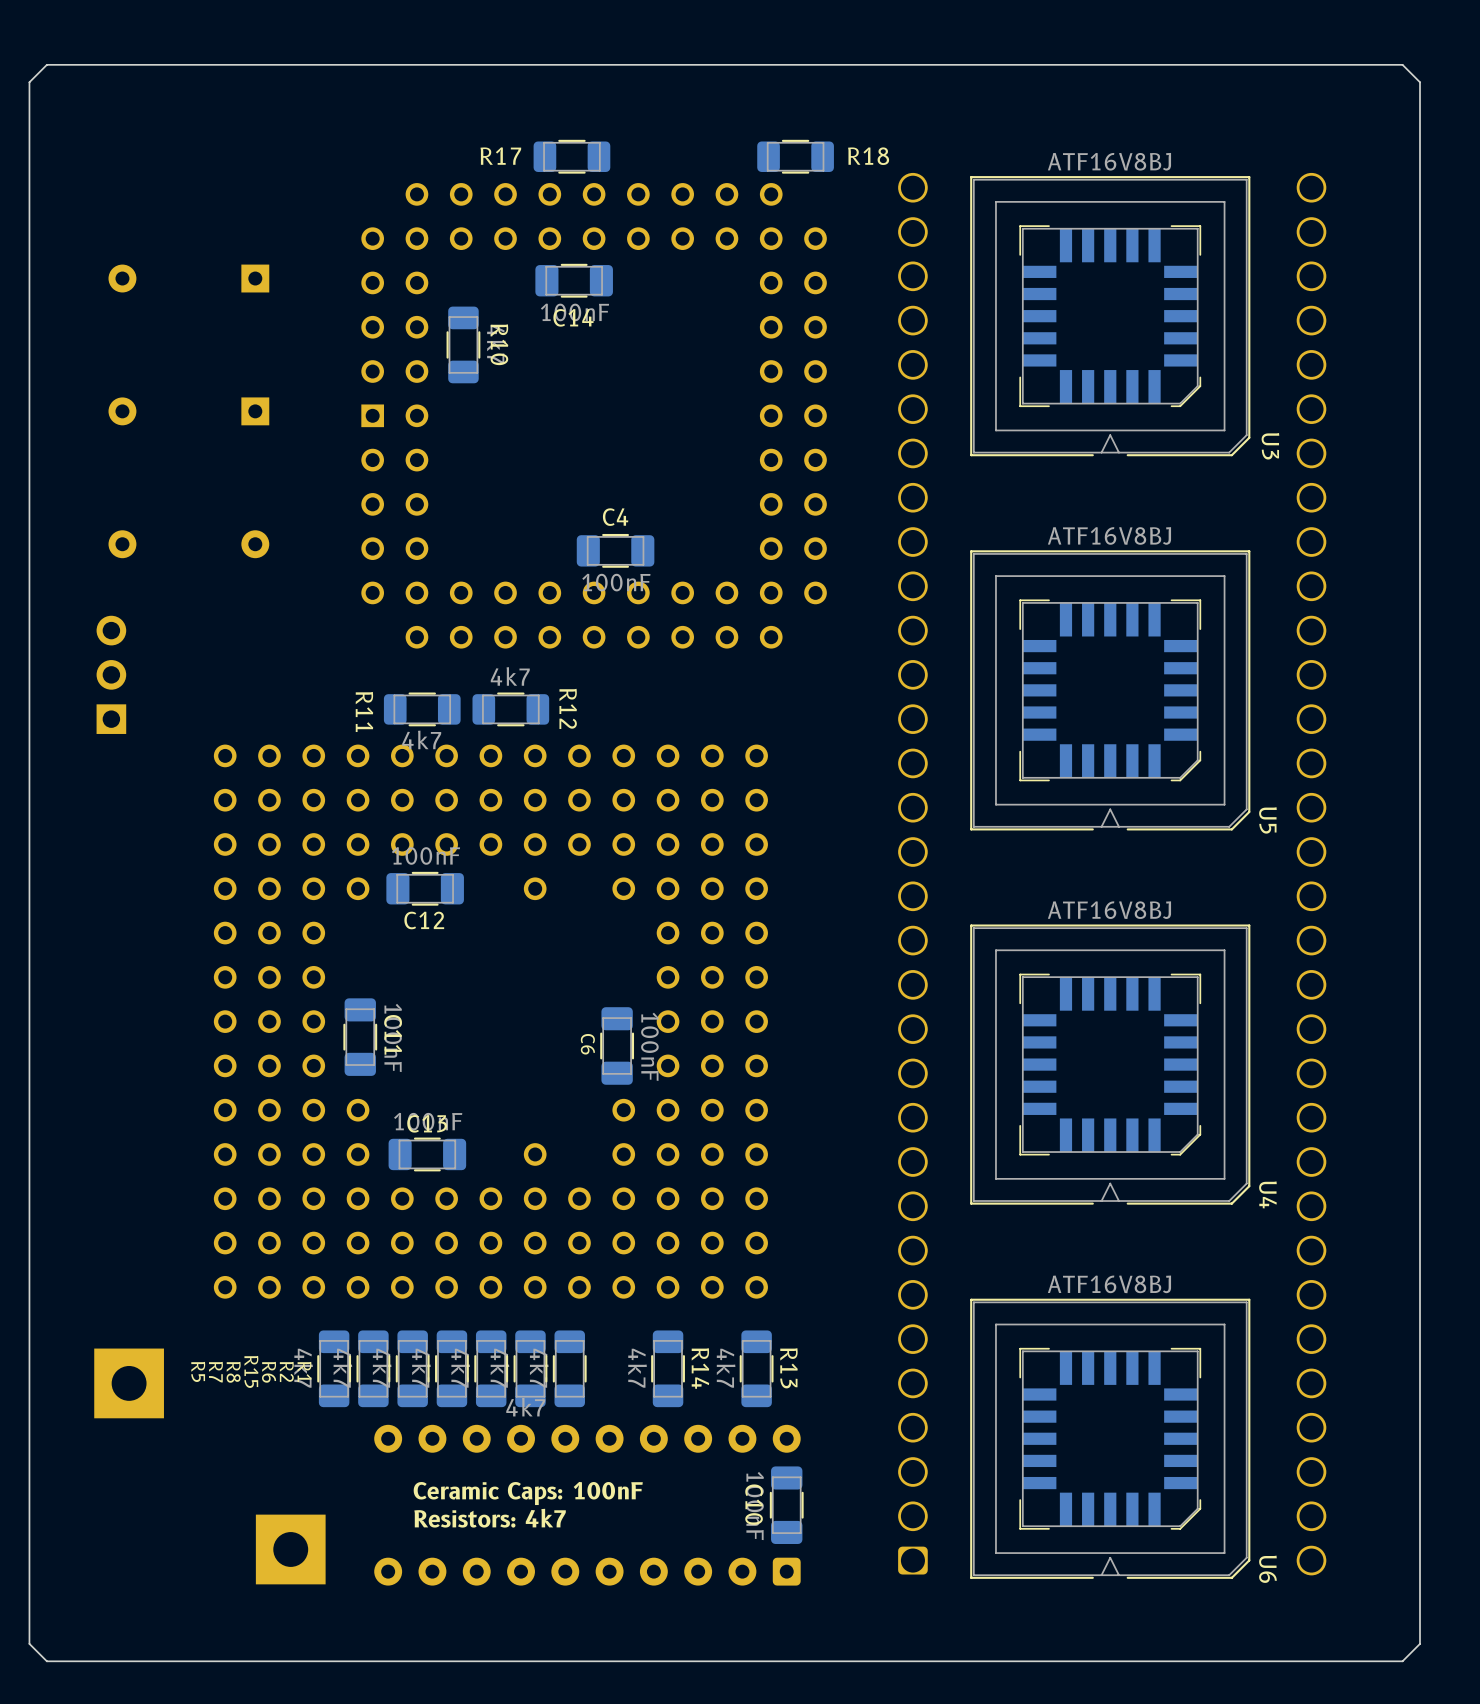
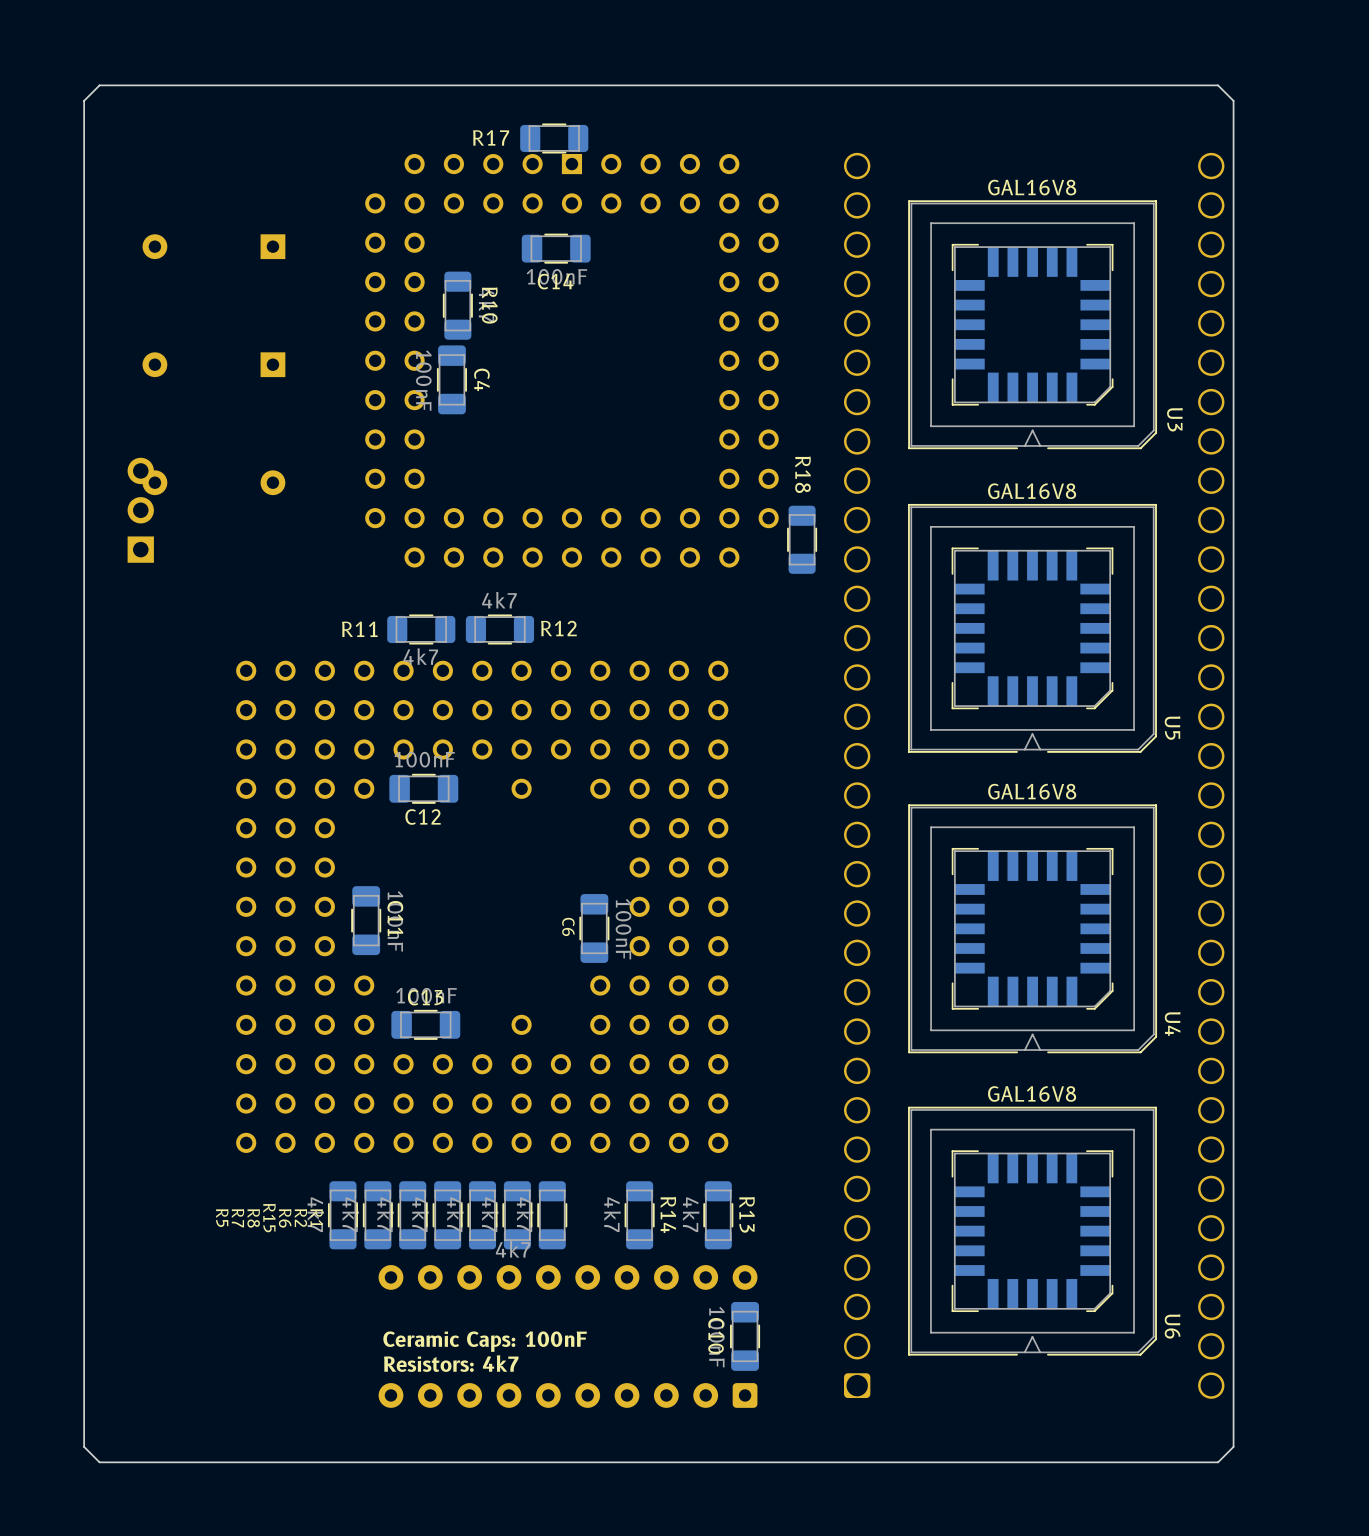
board edge: (1402, 64) (46, 64) (29, 82) (29, 1643) (46, 1661) (1402, 1661) (1420, 1643) (1420, 82) (1402, 64) -> (1218, 85) (1233, 100) (1233, 1446) (1218, 1462) (99, 1462) (84, 1446) (84, 100) (99, 85) (1218, 85)
R18 rotation: 0° (795, 156) -> 90° clockwise (802, 539)
R18 position: (795, 156) -> (802, 539)
R18 name position: R18 (868, 156) -> R18 (802, 474)
U3 value: ATF16V8BJ (1109, 161) -> GAL16V8 (1032, 187)
U3 footprint: [970, 176, 1251, 457] -> [908, 200, 1158, 450]
part rotation: 0° (594, 415) -> 90° clockwise (571, 360)
U5 value: ATF16V8BJ (1109, 535) -> GAL16V8 (1032, 491)
C4 rotation: 0° (615, 550) -> 90° clockwise (451, 379)
C4 position: (615, 550) -> (451, 379)
part position: (111, 674) -> (140, 510)
U5 position: (1110, 690) -> (1032, 628)
R12 name rotation: 0° (568, 708) -> 90° counterclockwise (558, 628)
R11 name rotation: 0° (364, 711) -> 90° counterclockwise (359, 629)
U4 value: ATF16V8BJ (1109, 910) -> GAL16V8 (1032, 791)
U4 footprint: [970, 924, 1251, 1205] -> [908, 804, 1158, 1054]
U6 value: ATF16V8BJ (1109, 1284) -> GAL16V8 (1032, 1093)
part: (129, 1383) -> none
U6 position: (1110, 1438) -> (1032, 1231)
text position: Ceramic Caps: 100nF (528, 1493) -> Ceramic Caps: 100nF (485, 1341)
text position: Resistors: 4k7 (490, 1518) -> Resistors: 4k7 (451, 1363)
part: (290, 1549) -> none
U6 name position: U6 (1267, 1569) -> U6 (1172, 1326)

